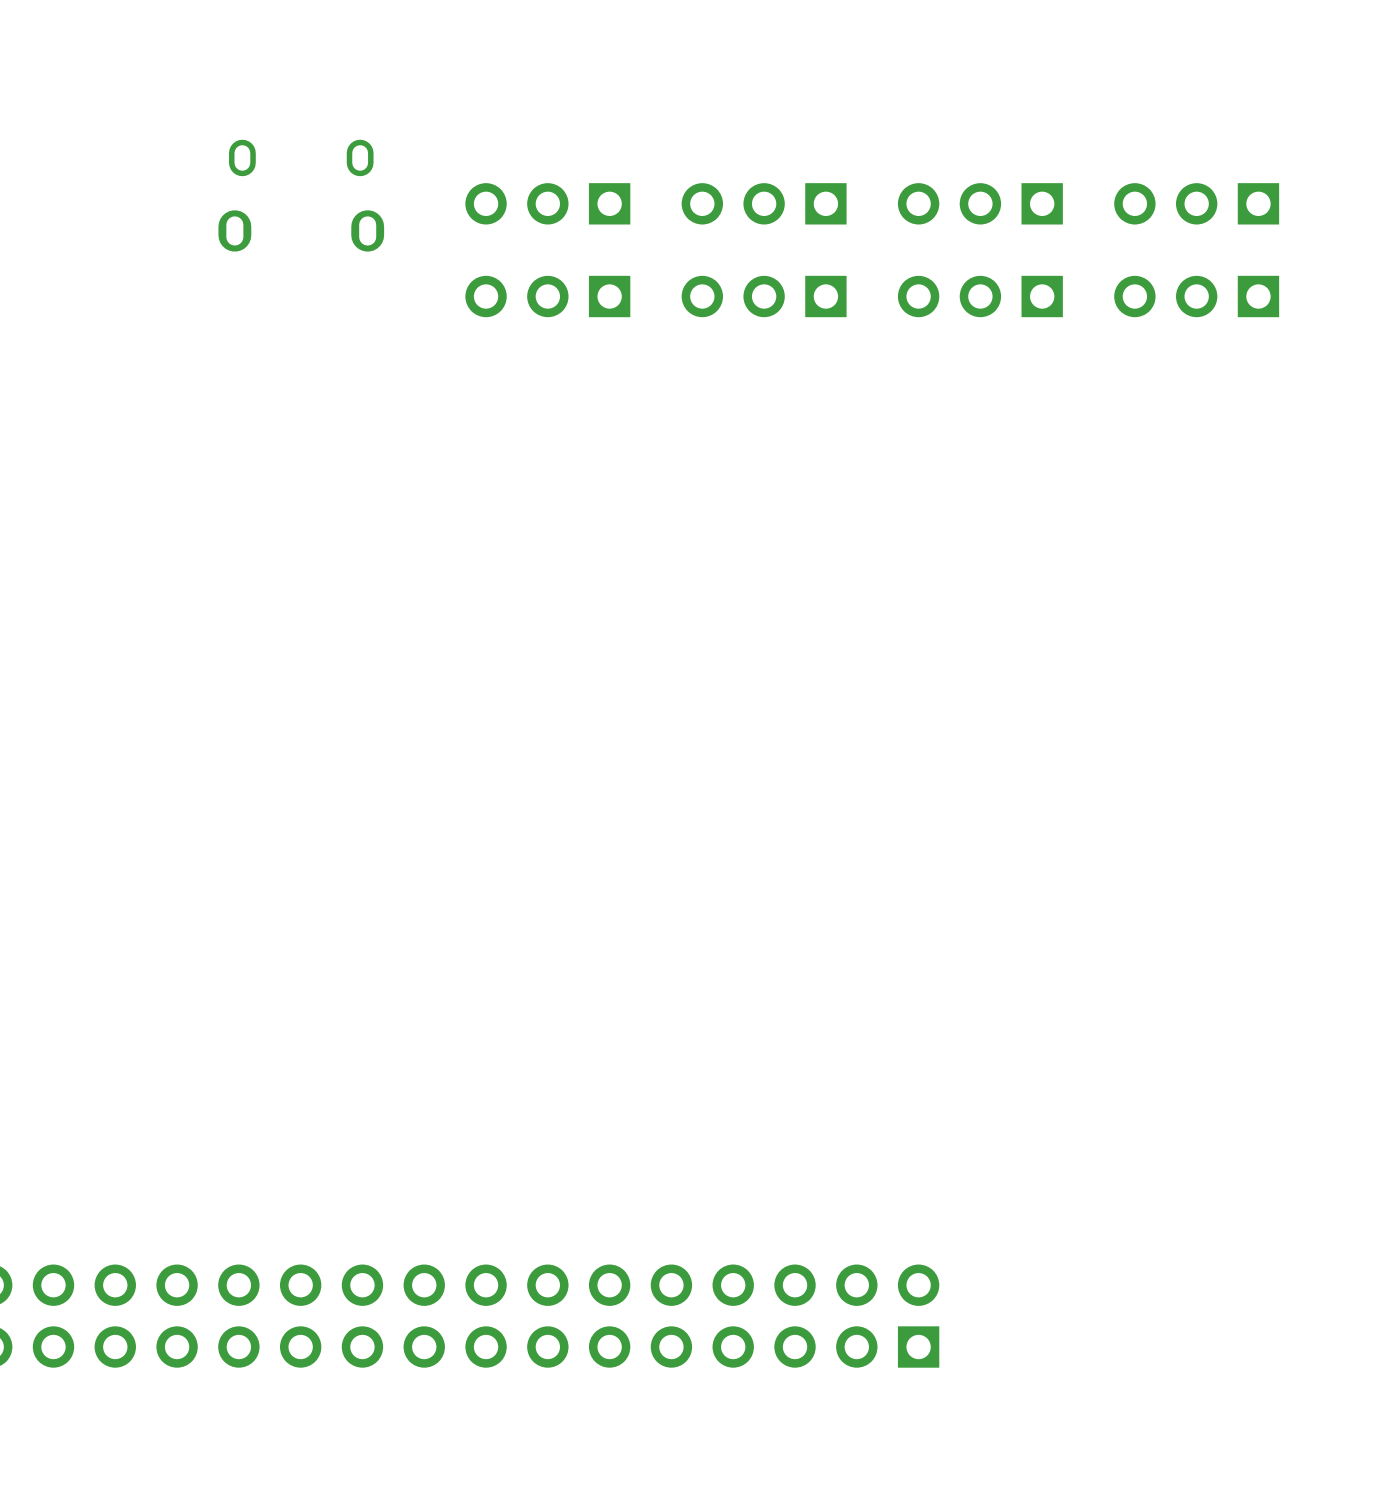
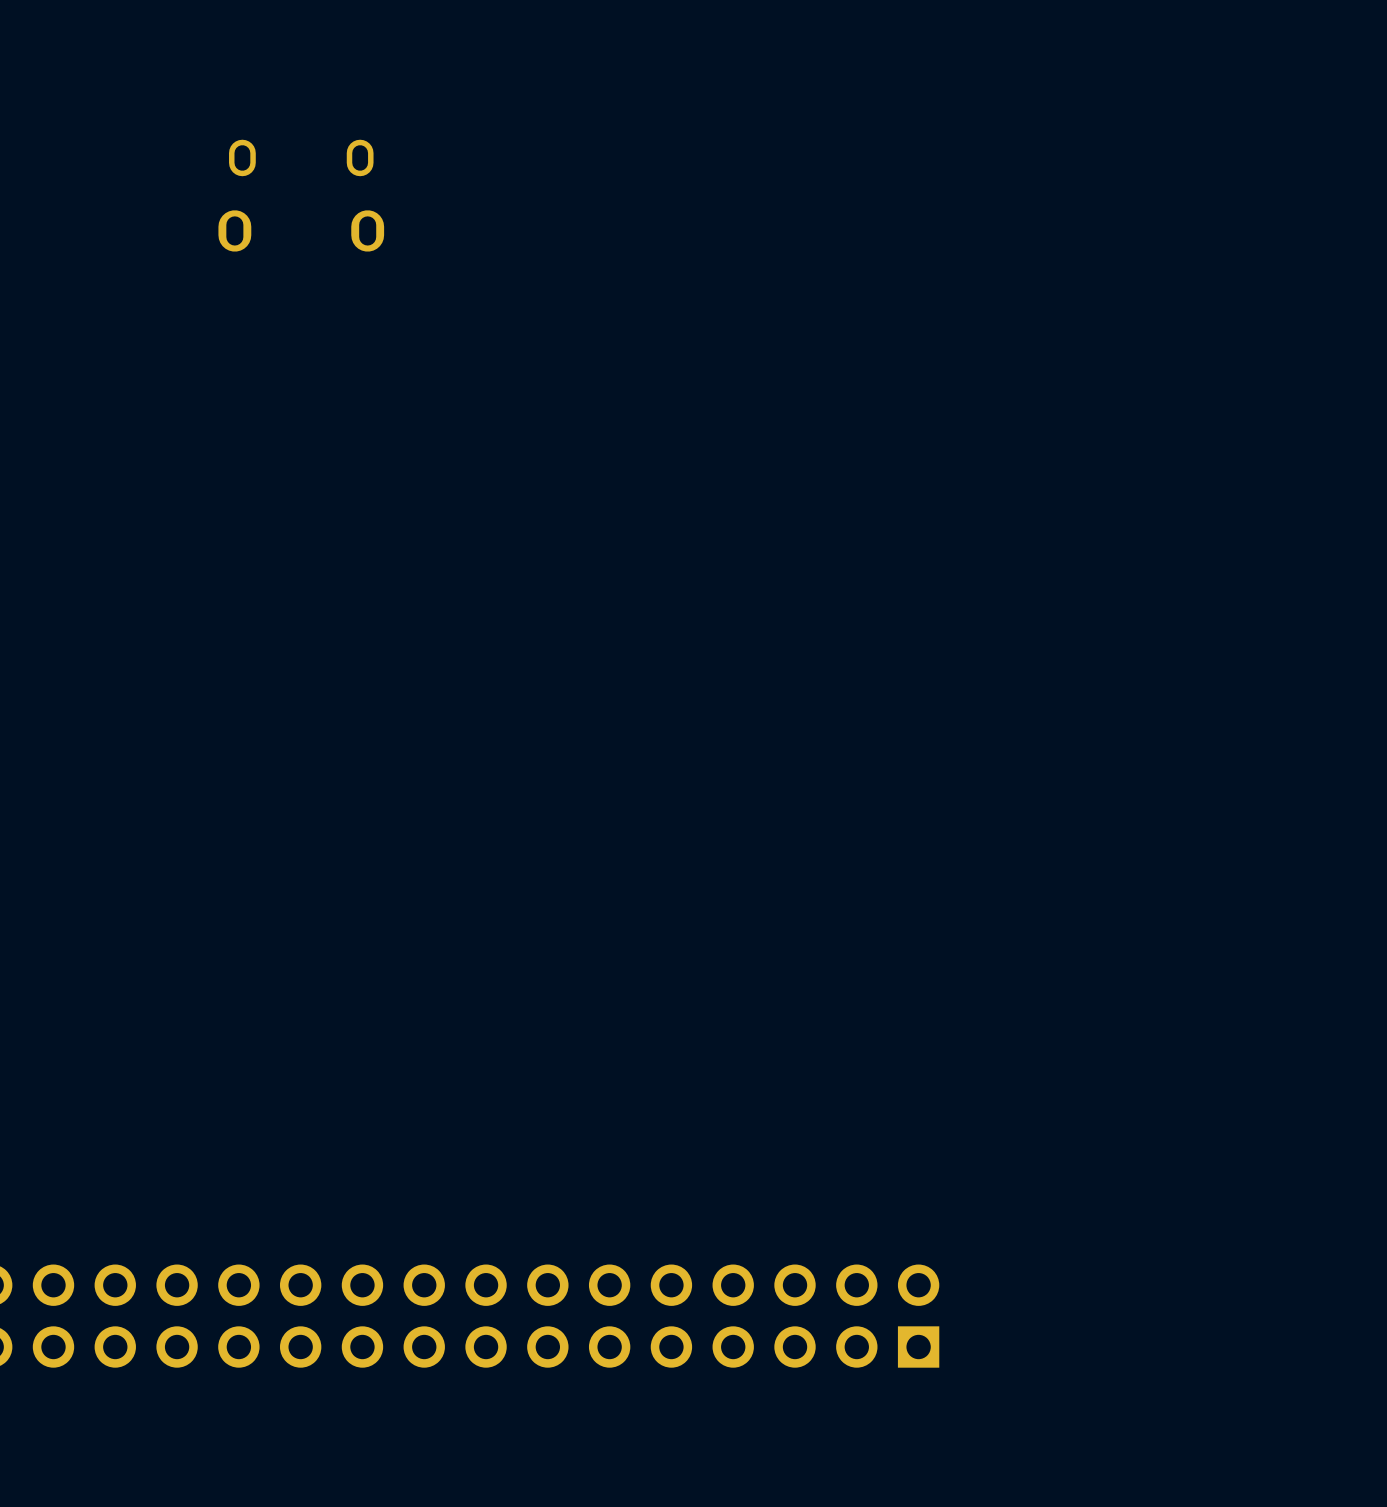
part: (547, 203) -> none
part: (764, 203) -> none
part: (980, 203) -> none
part: (1196, 203) -> none
part: (547, 296) -> none
part: (764, 296) -> none
part: (980, 296) -> none
part: (1196, 296) -> none

